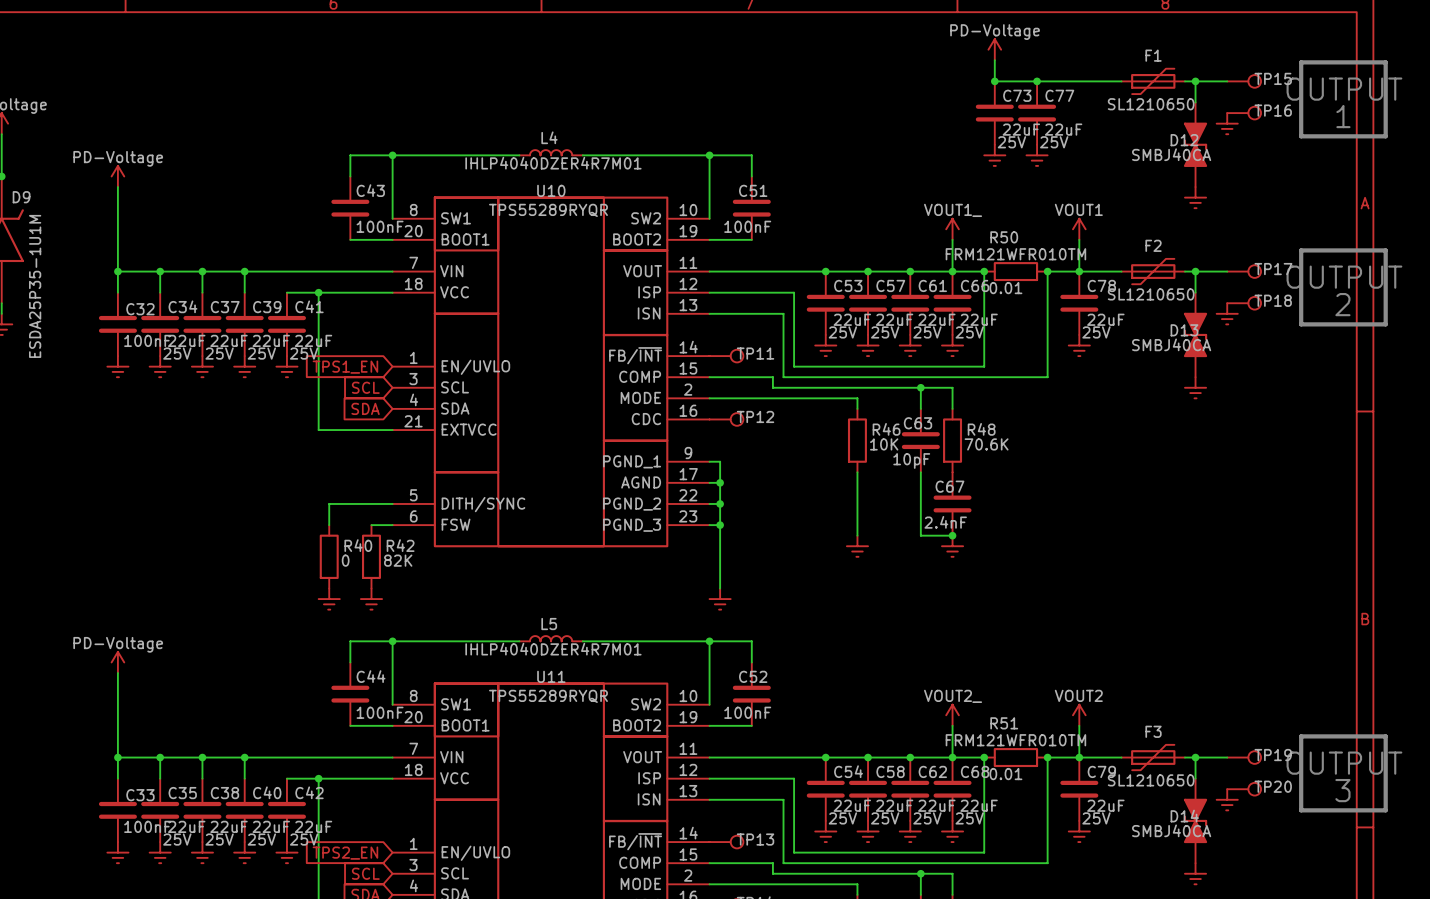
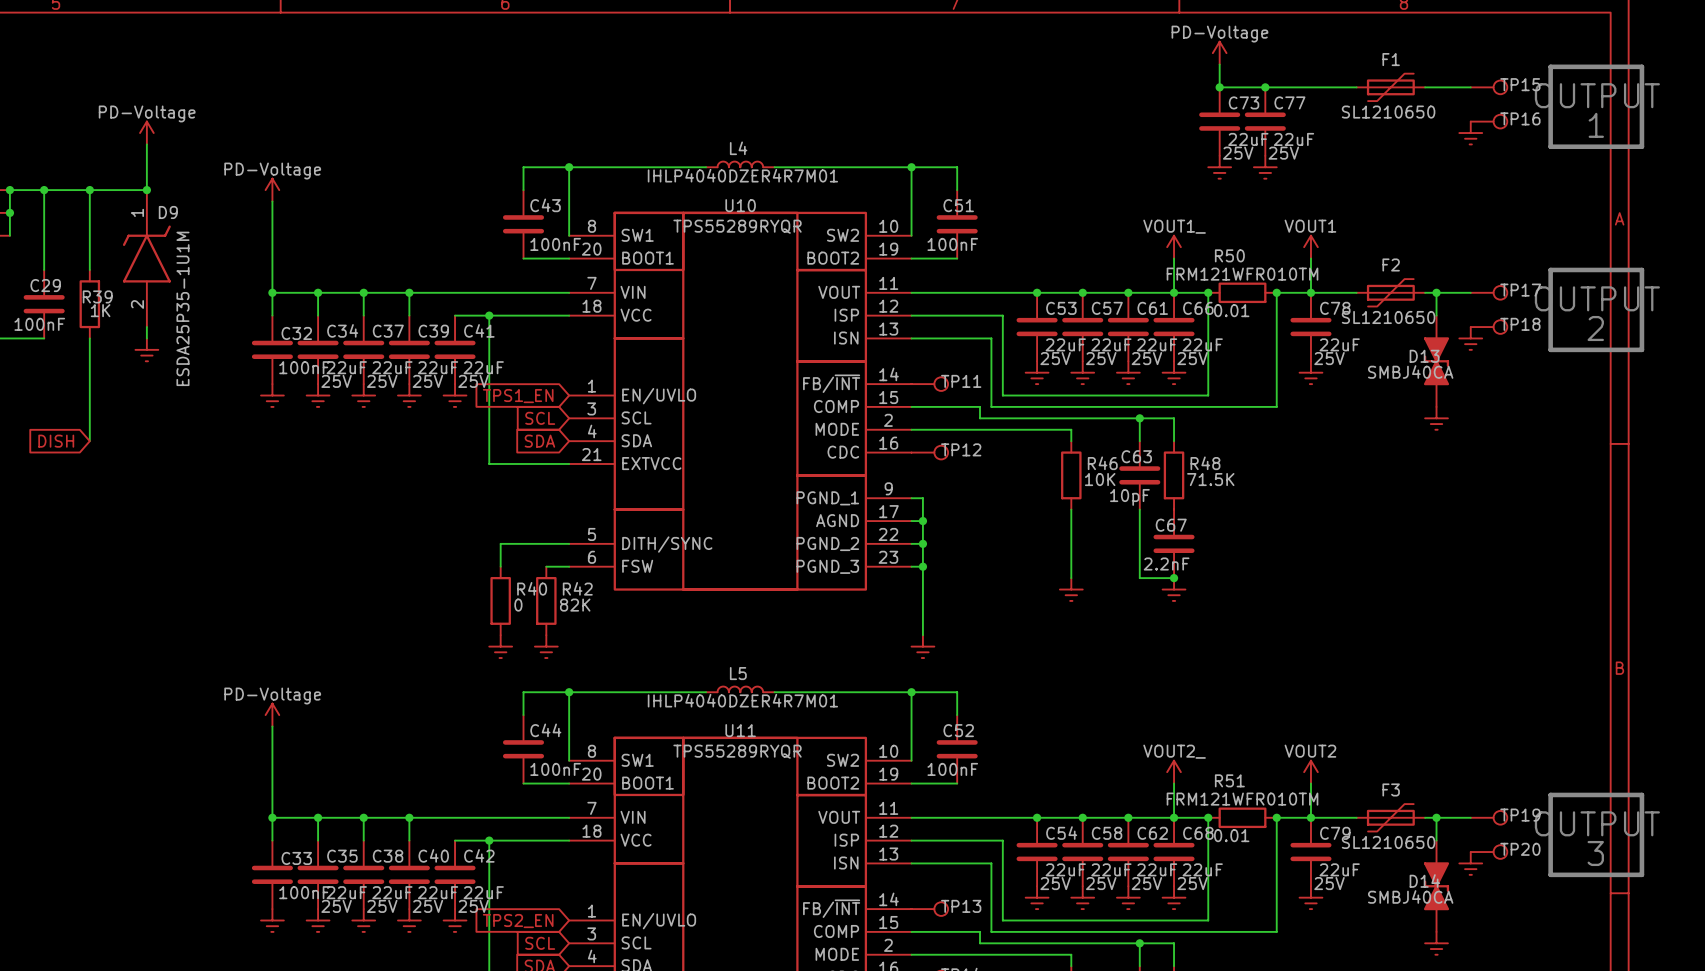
wire: (1195, 81) (1195, 102) -> none
junction: (1195, 81) -> none
D12: SMBJ40CA (1195, 144) -> none
power symbol: (1195, 197) -> none
R48 value: 70.6K (986, 444) -> 71.5K (1210, 479)
C67 value: 2.4nF (945, 522) -> 2.2nF (1166, 563)

